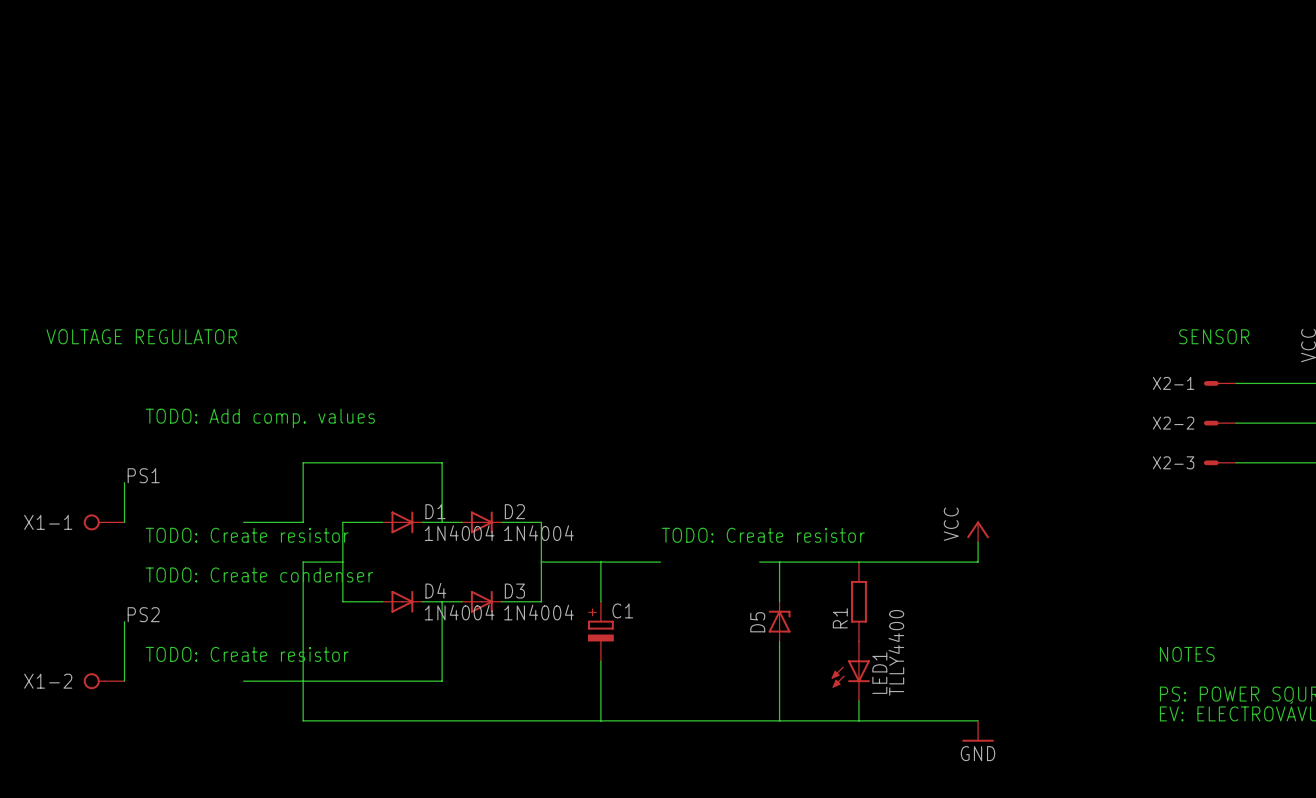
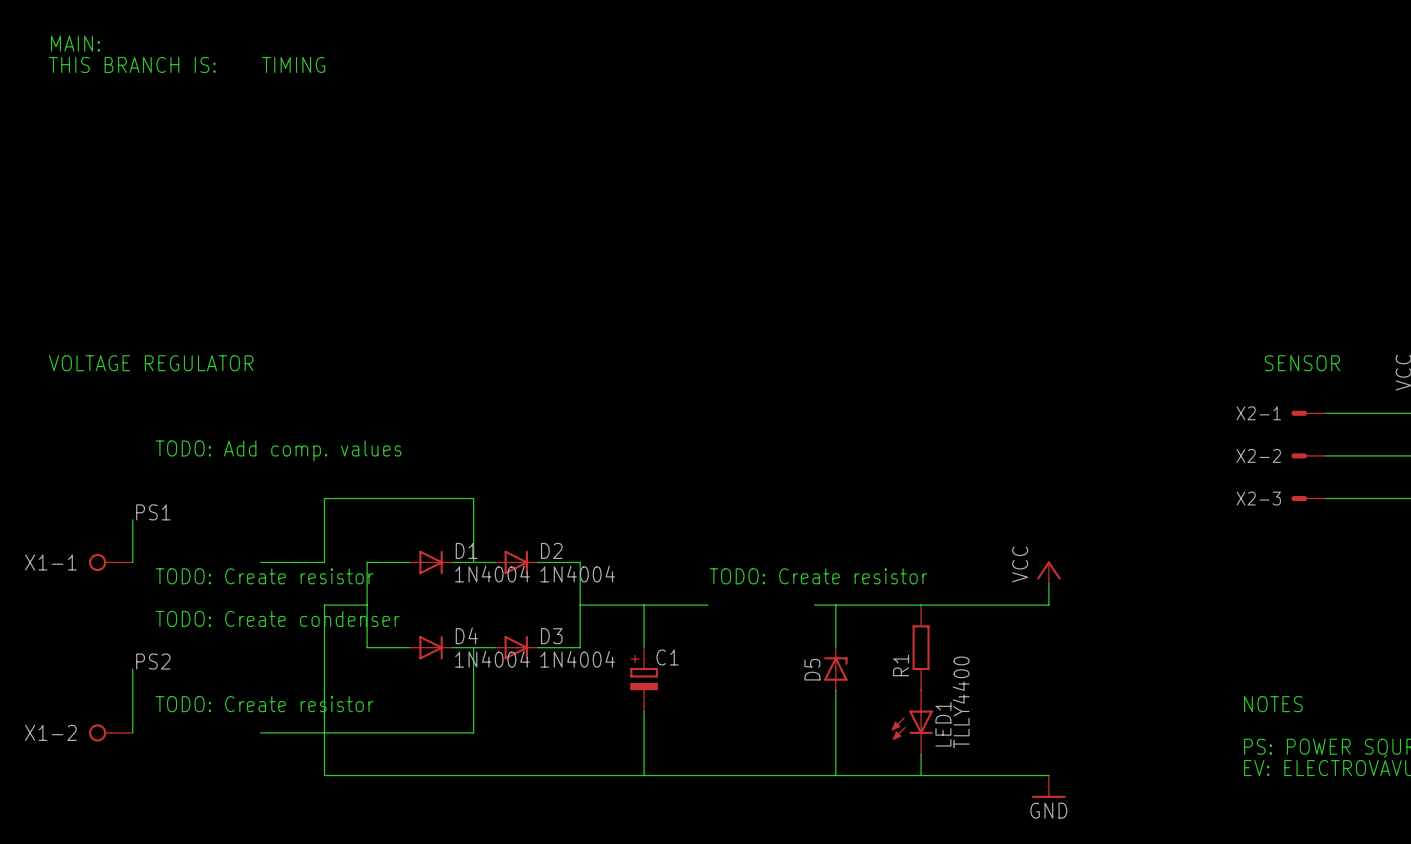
text: none -> MAIN: (75, 43)
text: none -> THIS BRANCH IS: (132, 64)
text: none -> TIMING (293, 64)

